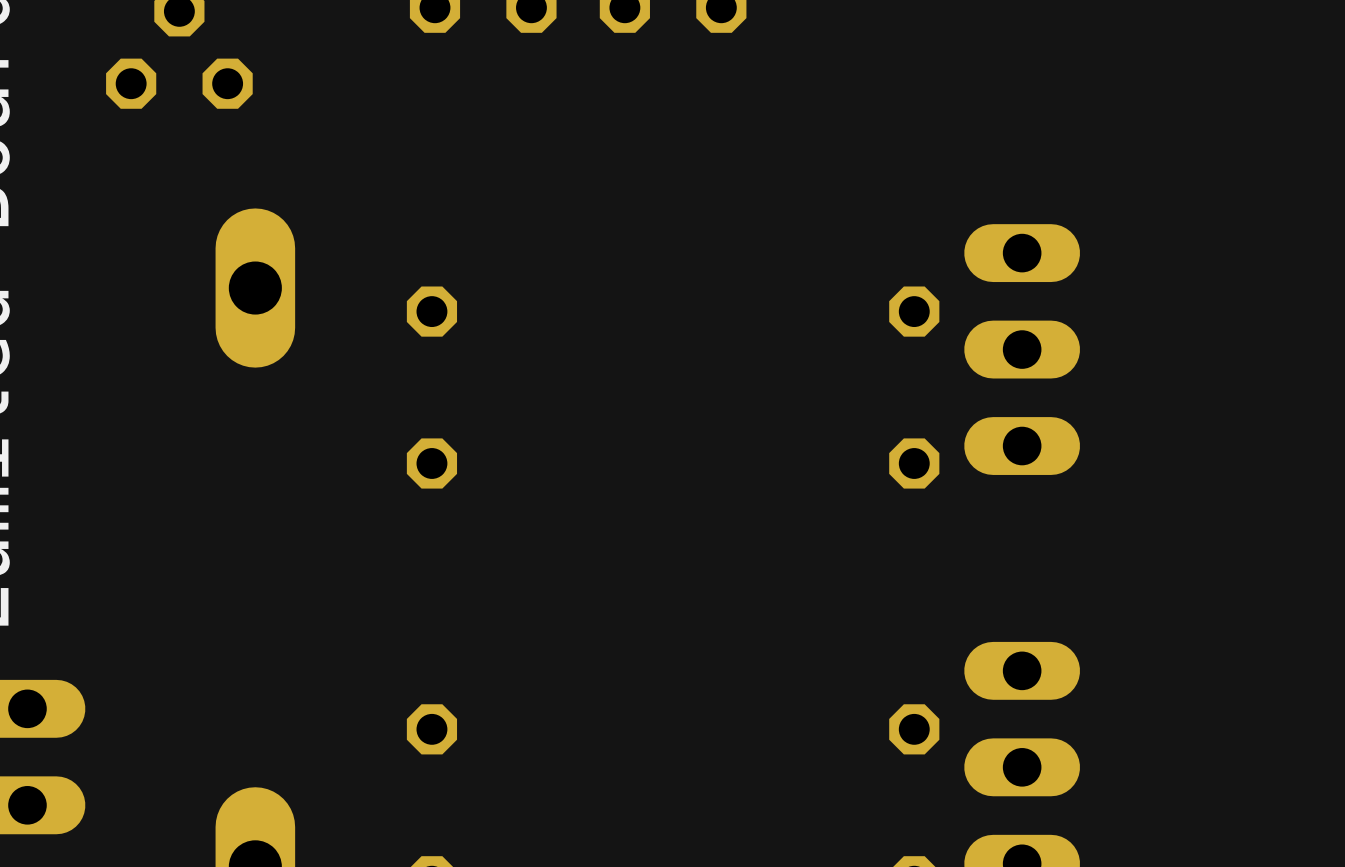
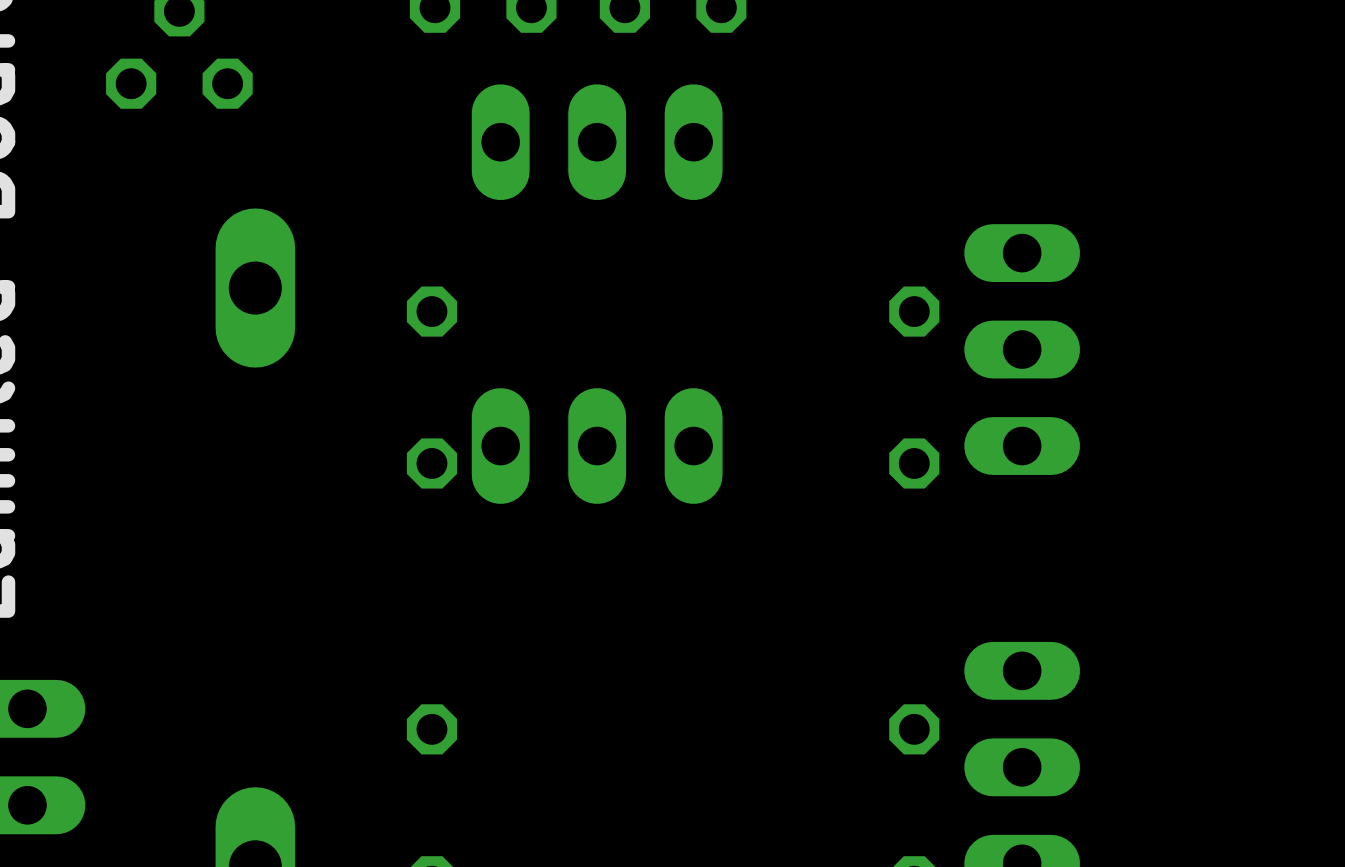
part: none -> (597, 142)
part: none -> (597, 446)

